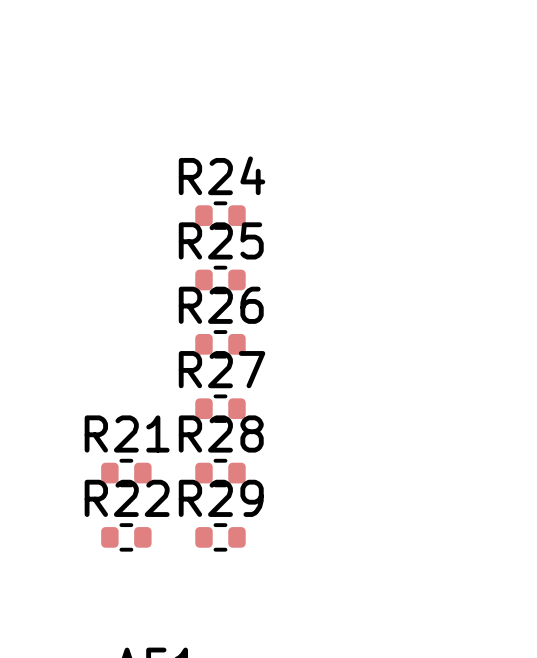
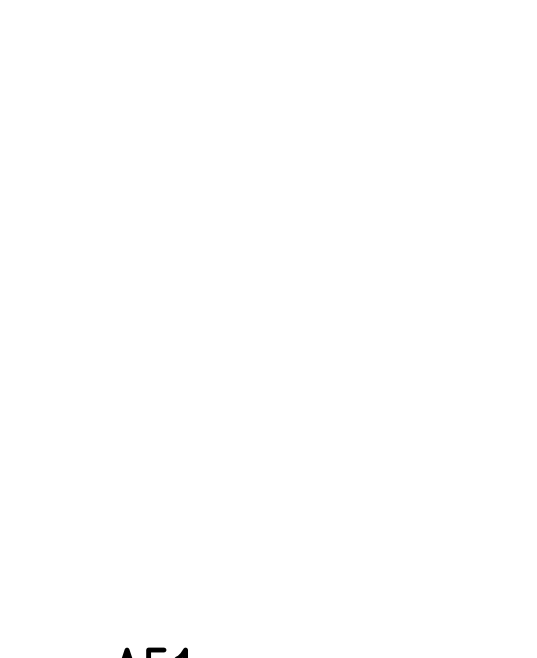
R24: (220, 215) -> none
R25: (220, 279) -> none
R26: (220, 344) -> none
R27: (220, 408) -> none
R21: (126, 473) -> none
R28: (220, 473) -> none
R22: (126, 537) -> none
R29: (220, 537) -> none

